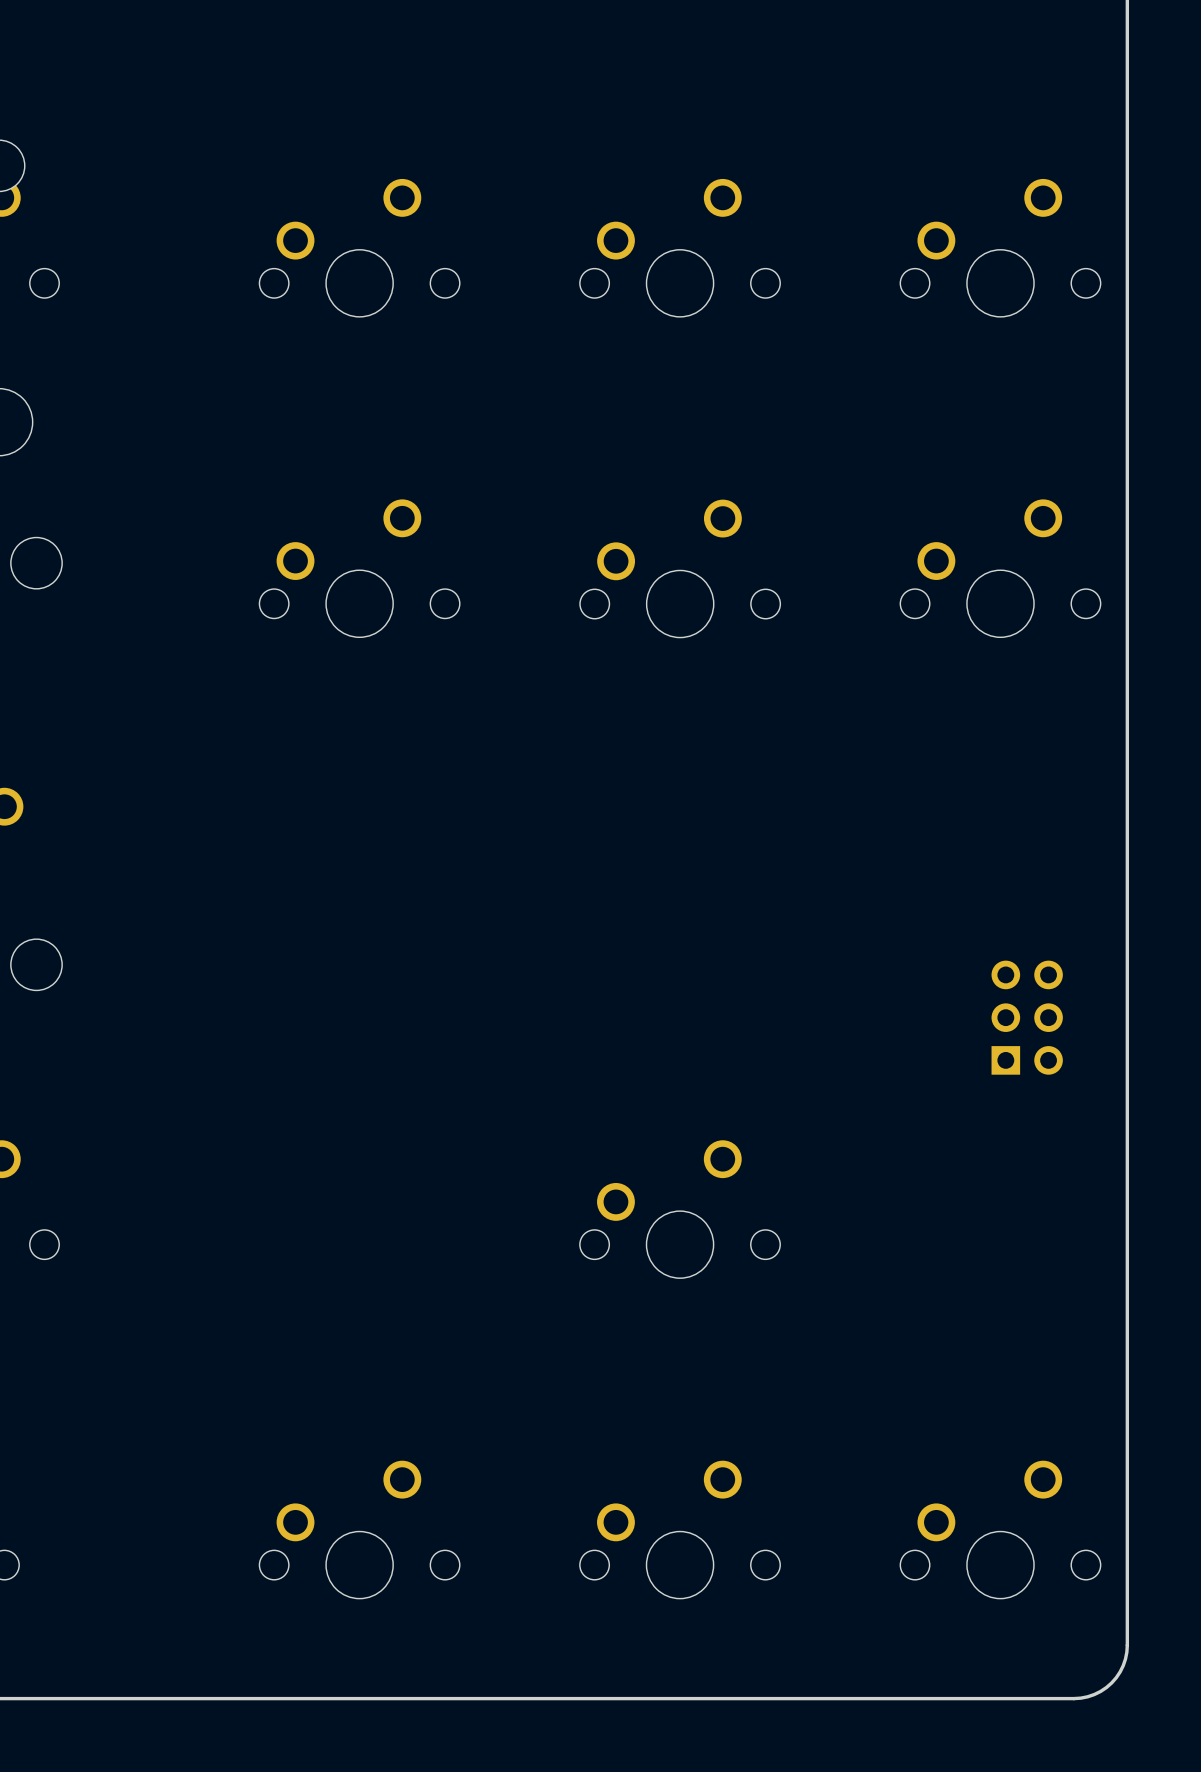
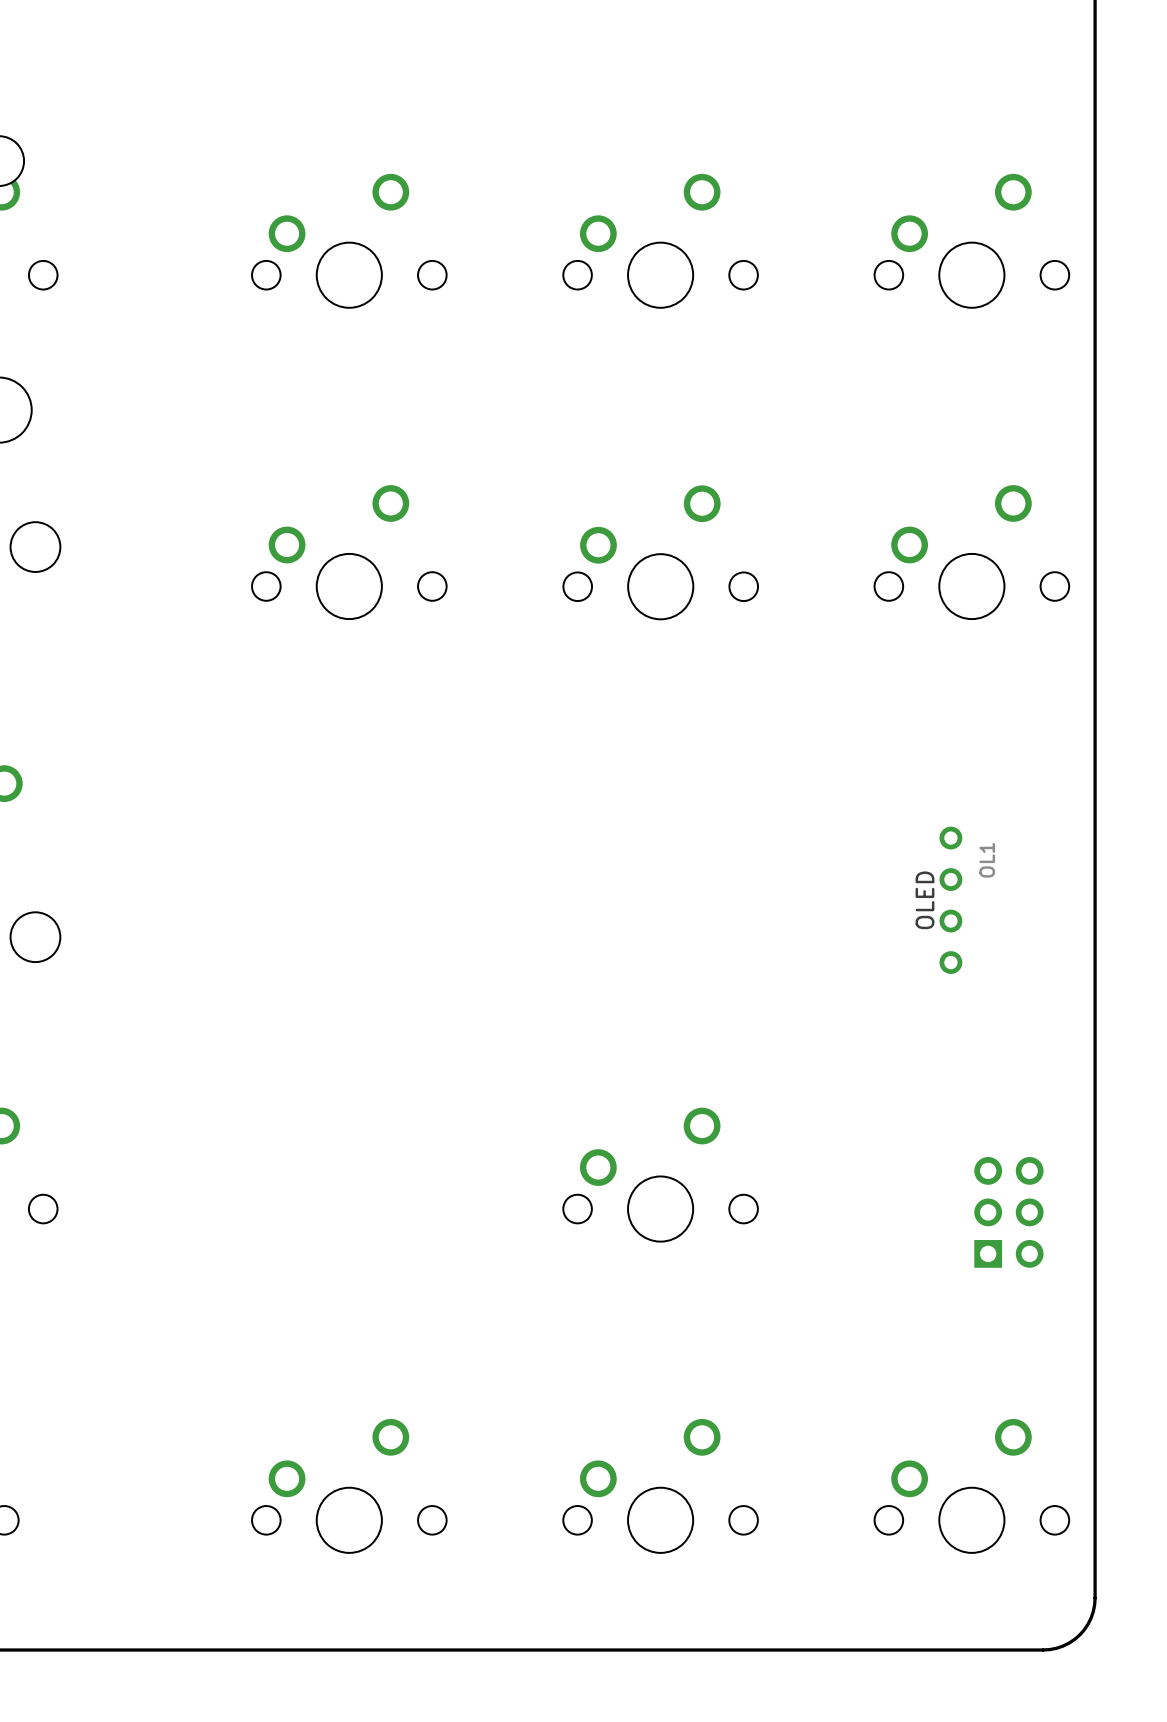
OL1: none -> (950, 900)
part position: (1027, 1017) -> (1008, 1212)

